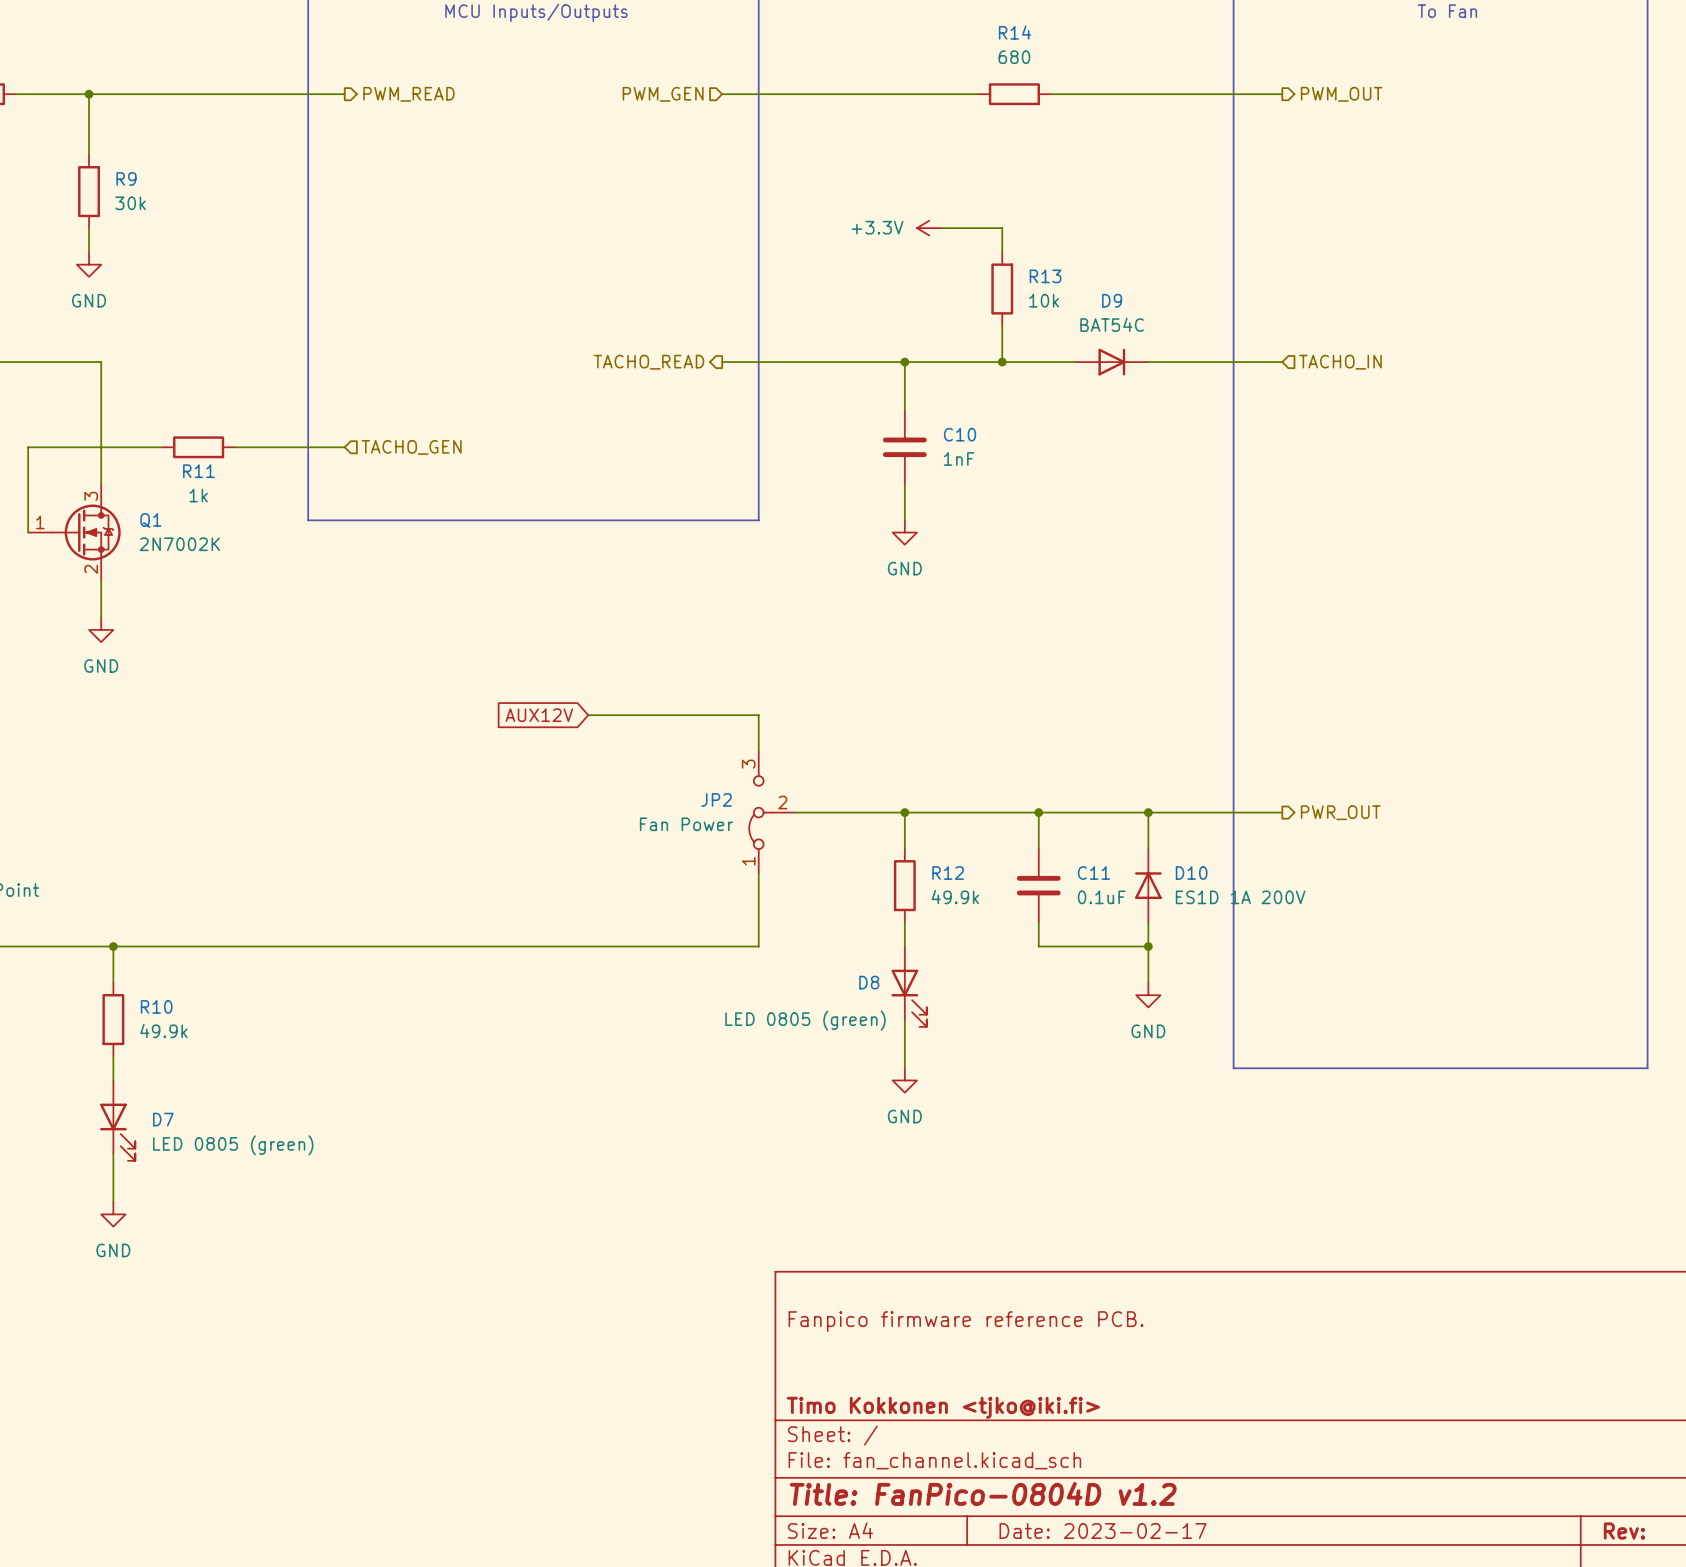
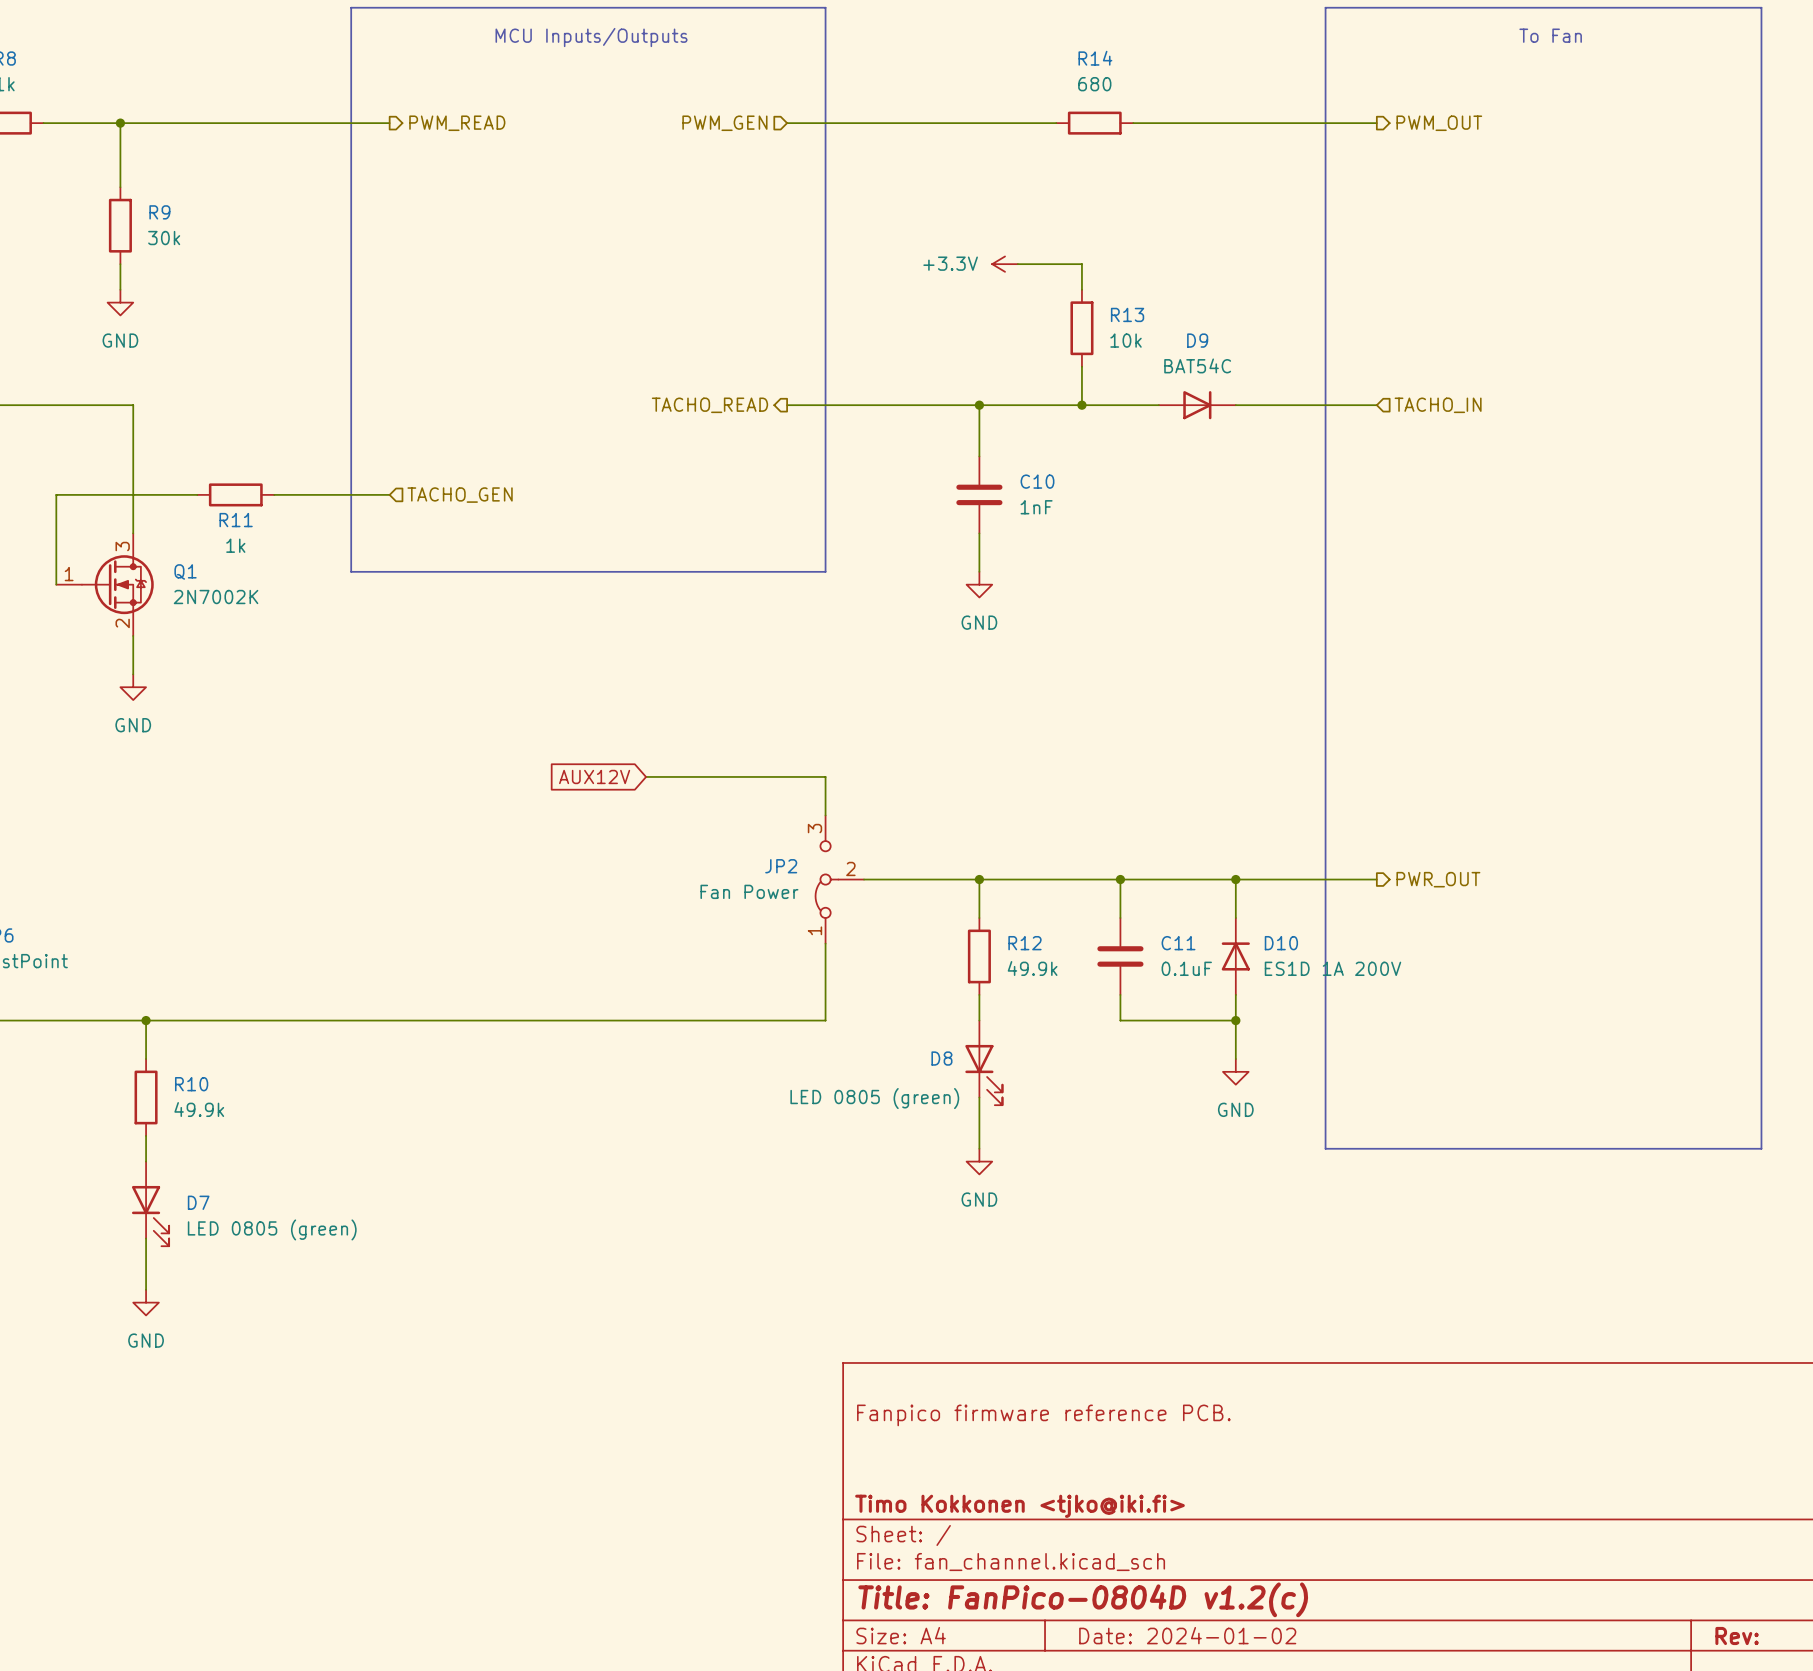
title block: Title: FanPico-0804D v1.2 (983, 1493) -> Title: FanPico-0804D v1.2(c) (1083, 1599)
title block: Date: 2023-02-17 (1103, 1531) -> Date: 2024-01-02 (1187, 1635)

